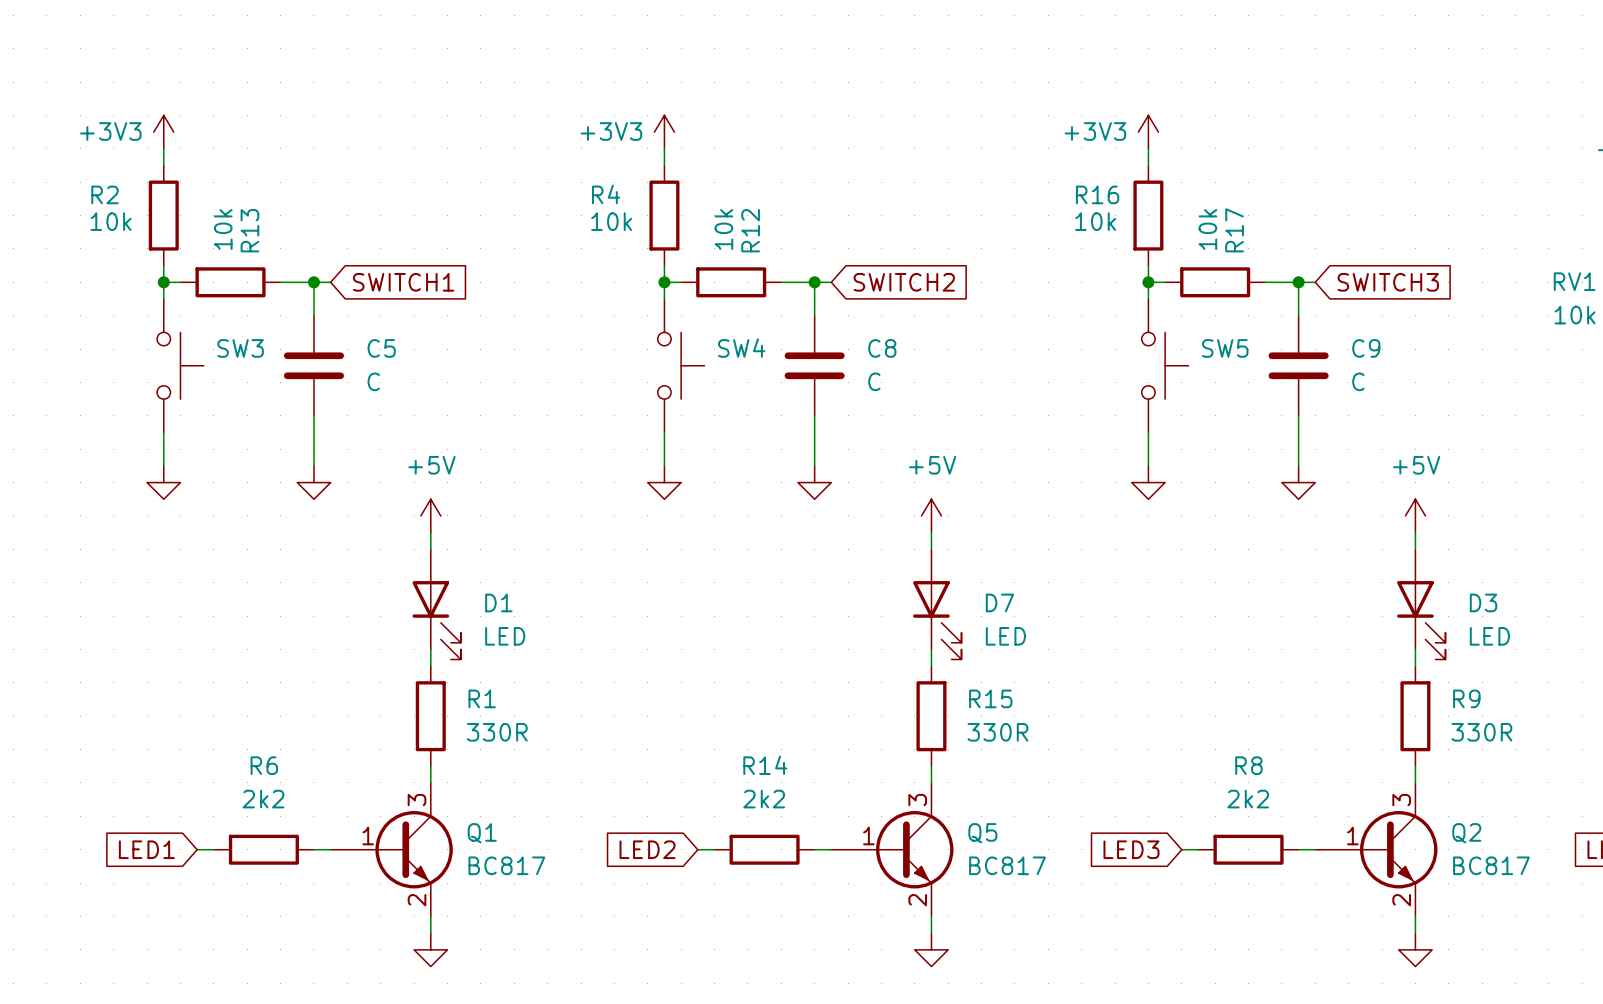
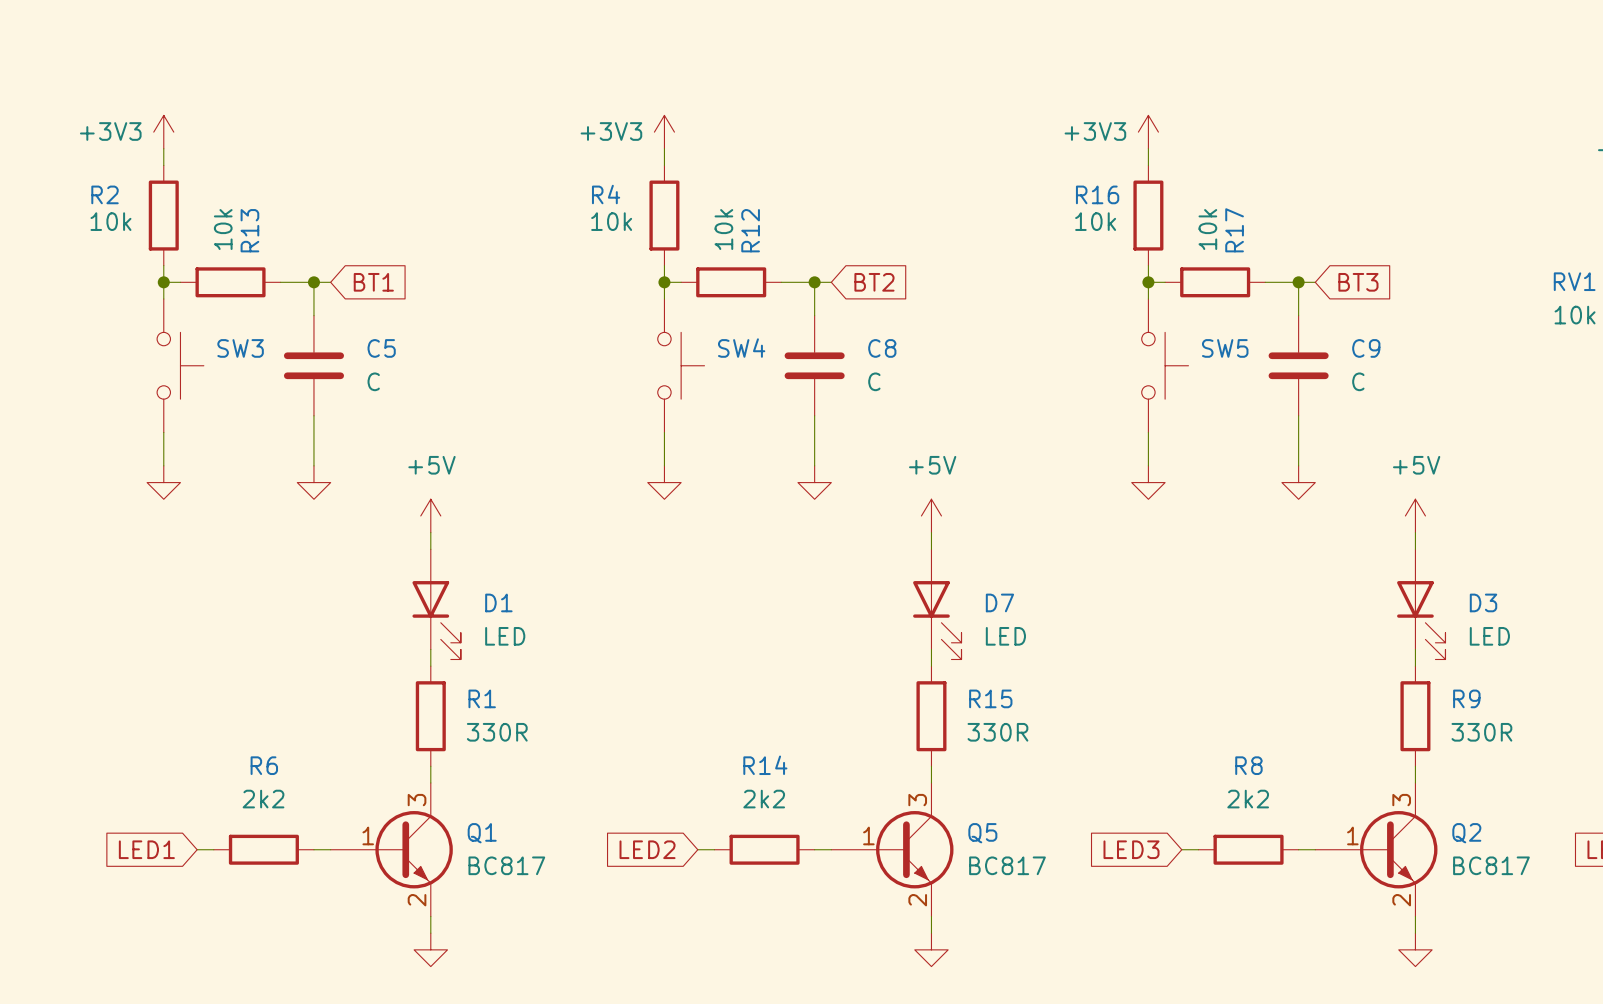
global label: SWITCH1 (403, 282) -> BT1 (373, 282)
global label: SWITCH2 (904, 282) -> BT2 (874, 282)
global label: SWITCH3 (1388, 282) -> BT3 (1358, 282)

